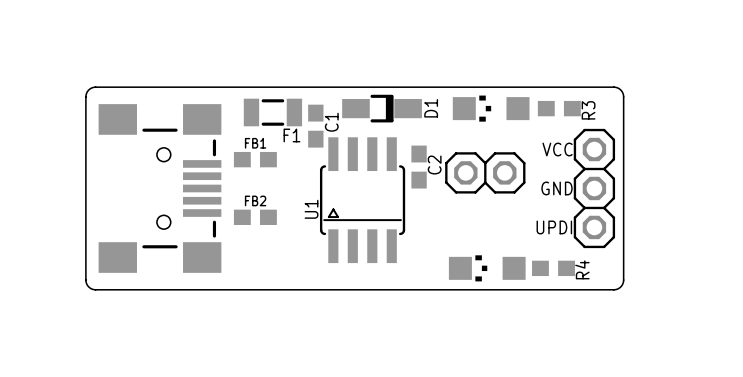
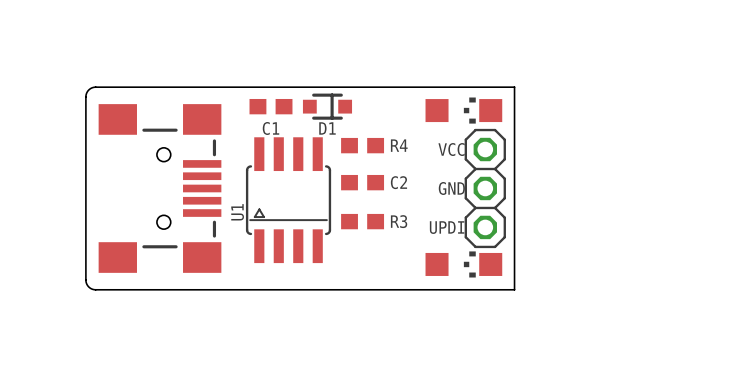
board edge: (514, 87) (615, 87) (621, 90) (623, 96) (622, 284) (613, 289) (514, 289) -> (514, 87) (514, 289)
D1 footprint: [342, 94, 422, 123] -> [302, 93, 353, 120]
D1 name position: D1 (431, 108) -> D1 (327, 128)
part rotation: 0° (491, 108) -> 180° (463, 110)
R3 position: (559, 108) -> (362, 221)
R3 name rotation: 0° (588, 110) -> 90° clockwise (399, 221)
F1: (272, 112) -> none
C1 rotation: 0° (315, 126) -> 90° clockwise (270, 106)
C1 position: (315, 126) -> (270, 106)
text position: VCC (557, 149) -> VCC (451, 149)
FB1: (255, 159) -> none
C2 rotation: 0° (419, 167) -> 90° clockwise (362, 182)
C2 position: (419, 167) -> (362, 182)
part: (485, 172) -> none
text position: GND (557, 188) -> GND (451, 188)
part position: (594, 188) -> (485, 188)
U1 position: (362, 200) -> (288, 200)
FB2: (255, 217) -> none
text position: UPDI (554, 227) -> UPDI (447, 227)
part rotation: 0° (487, 268) -> 180° (463, 264)
R4 position: (553, 268) -> (362, 145)
R4 name rotation: 0° (582, 269) -> 90° clockwise (399, 145)

